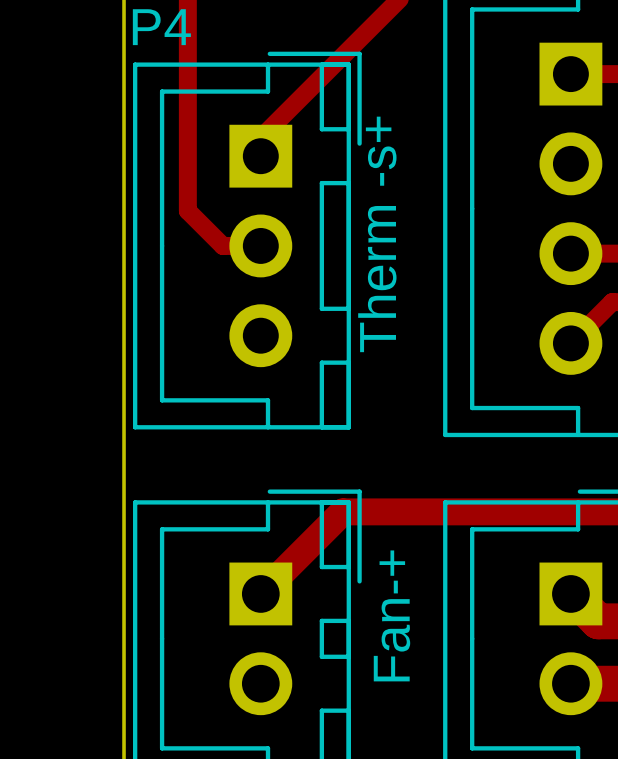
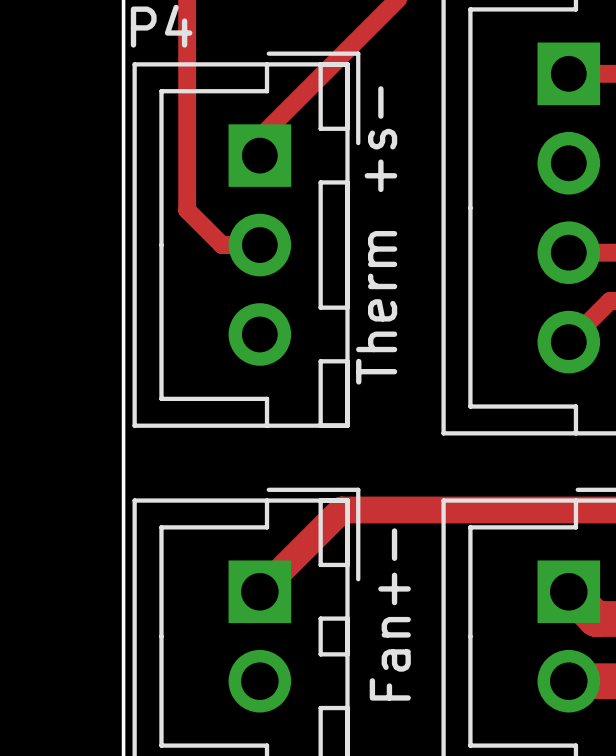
P4 value: Therm -s+ (377, 234) -> Therm +s- (376, 235)
part value: Fan-+ (391, 615) -> Fan+- (390, 614)

